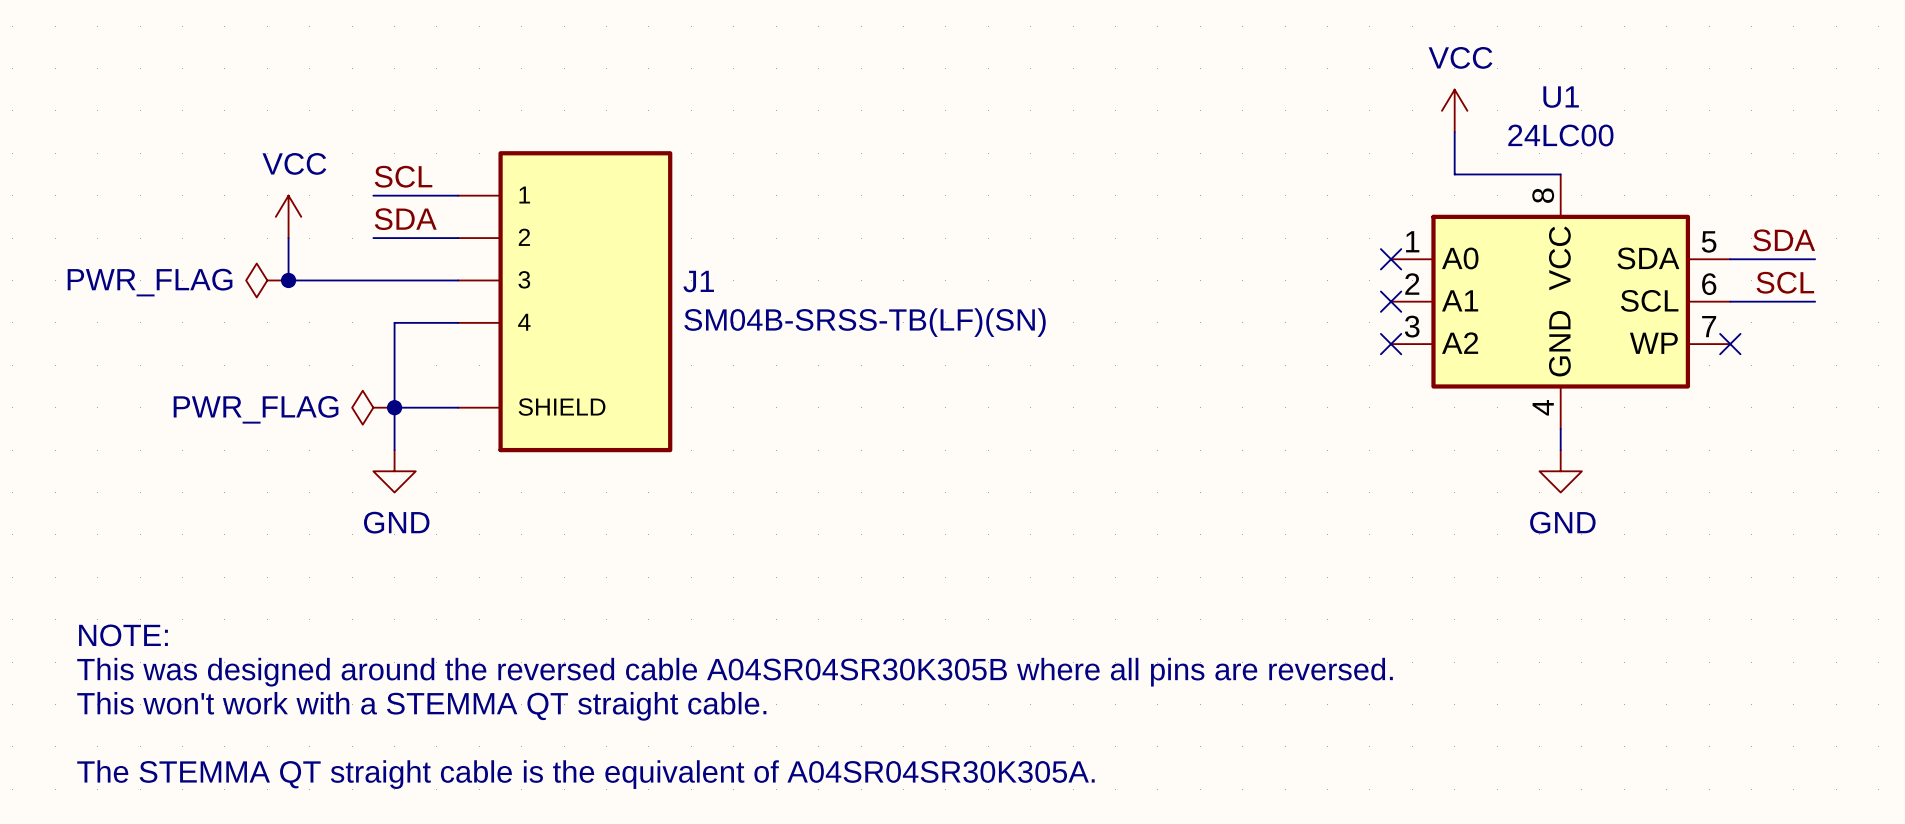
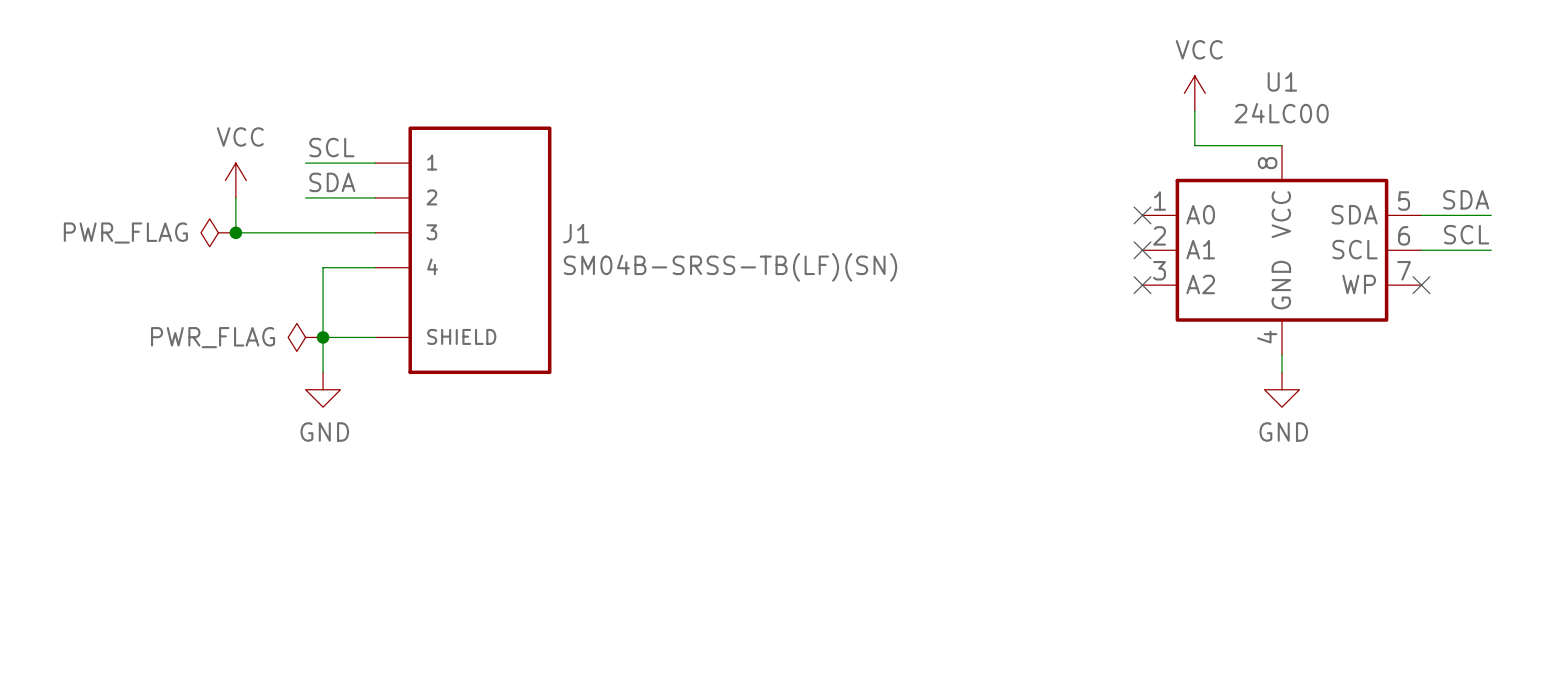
text: NOTE: (123, 635) -> none
text: This was designed around the reversed cable A04SR04SR30K305B where all pins are reversed. (735, 672) -> none
text: This won't work with a STEMMA QT straight cable. (421, 706) -> none
text: The STEMMA QT straight cable is the equivalent of A04SR04SR30K305A. (585, 774) -> none

